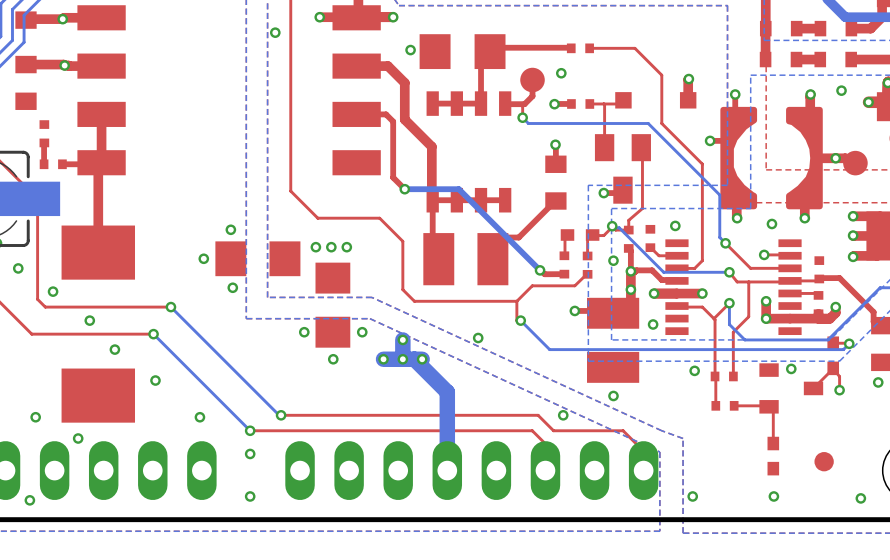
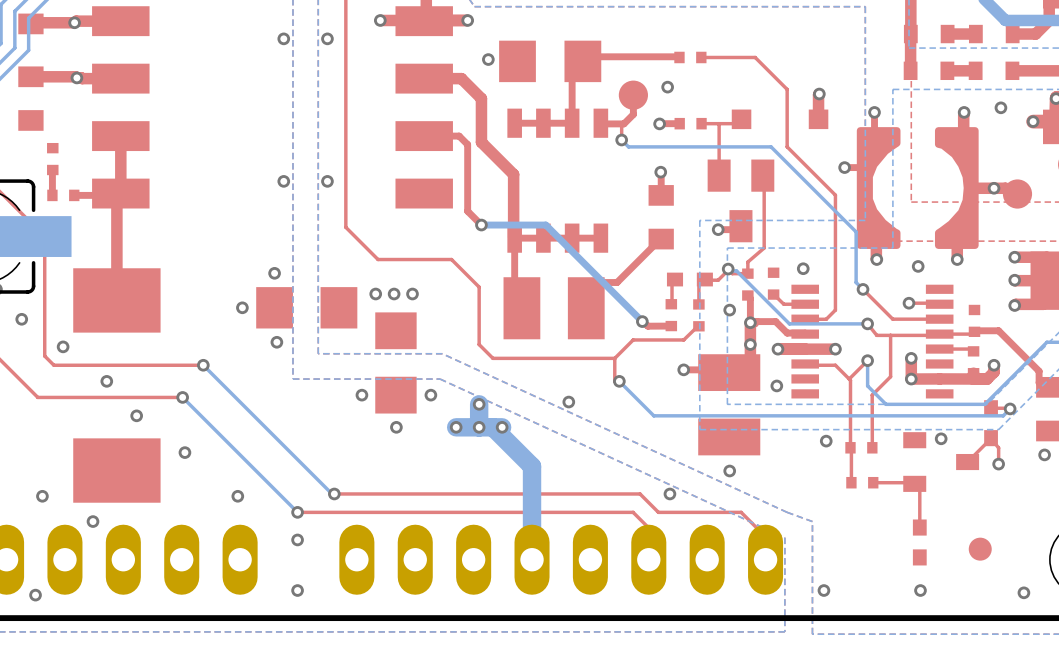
via: none -> (283, 38)
via: none -> (283, 181)
via: none -> (327, 181)

